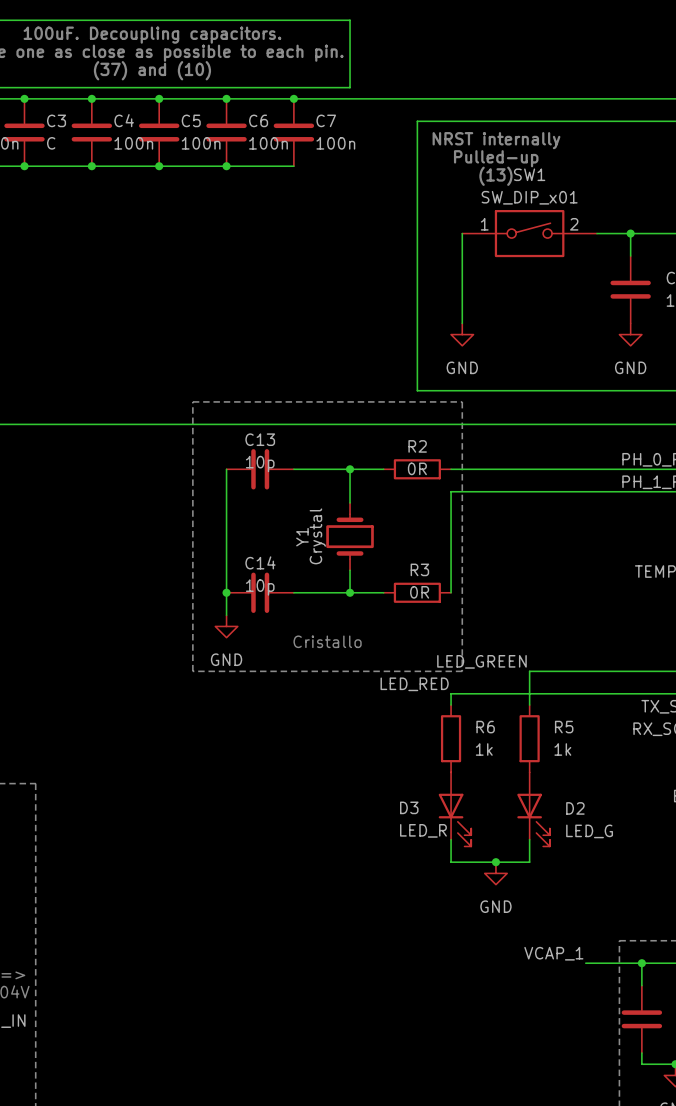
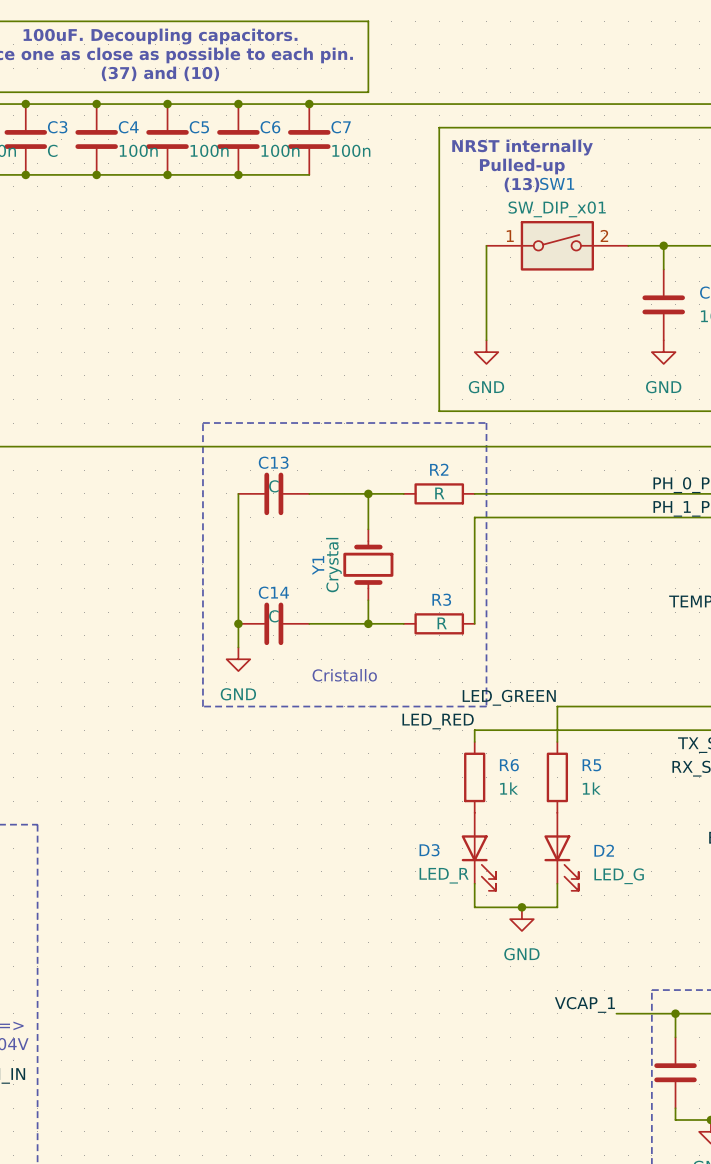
C13 value: 10p (260, 464) -> C (273, 486)
R2 value: 0R (417, 468) -> R (439, 493)
C14 value: 10p (260, 587) -> C (273, 616)
R3 value: 0R (419, 592) -> R (442, 623)

